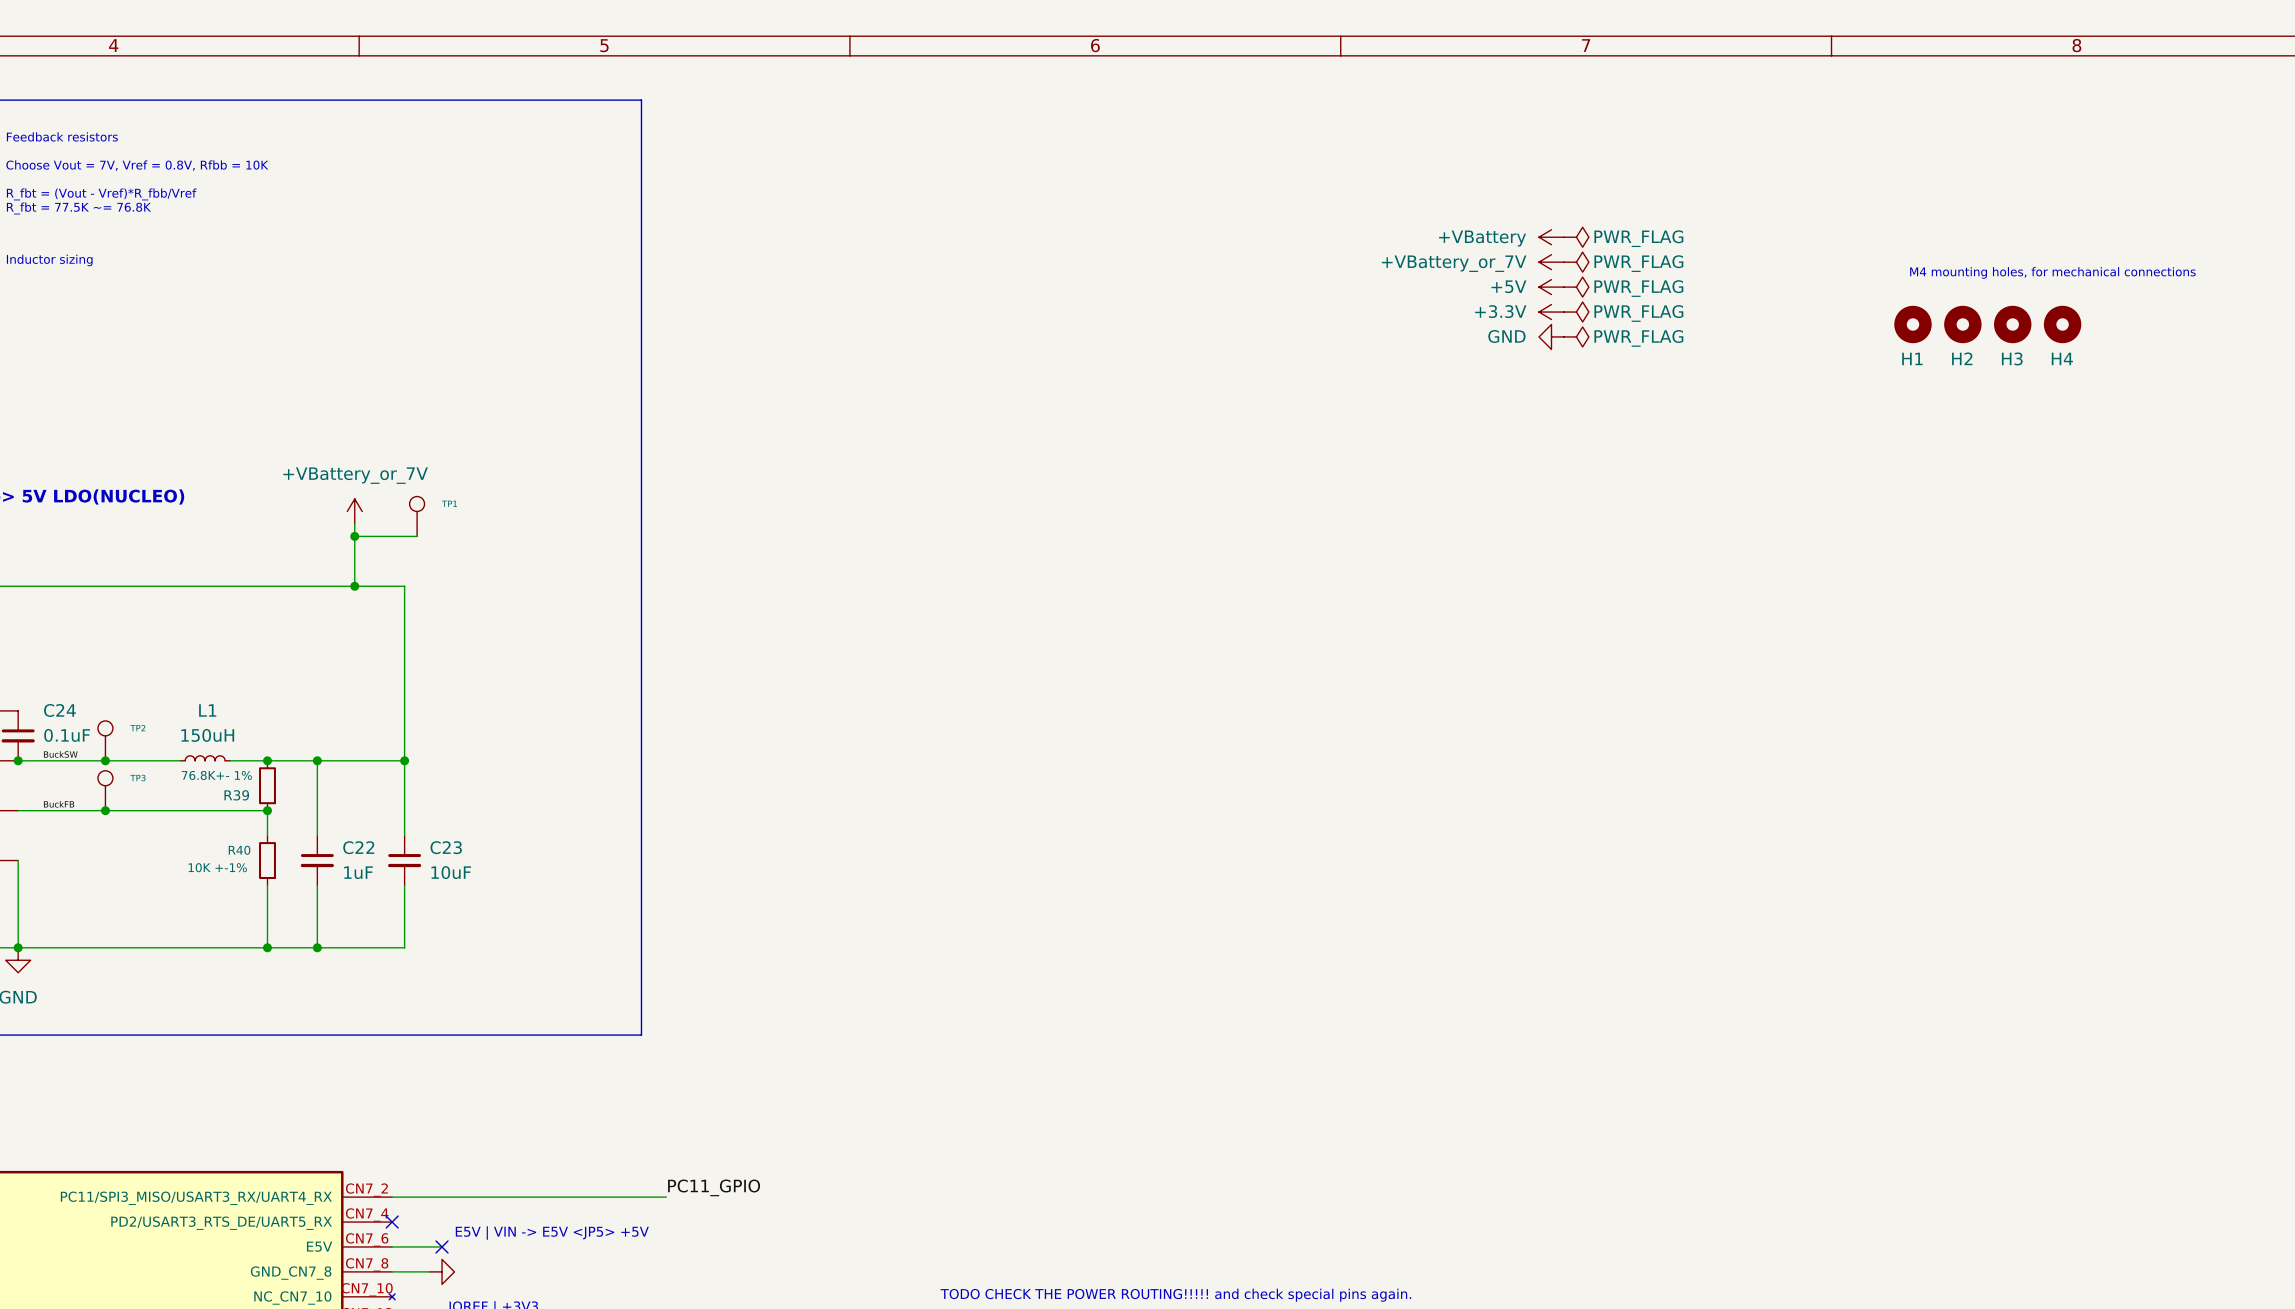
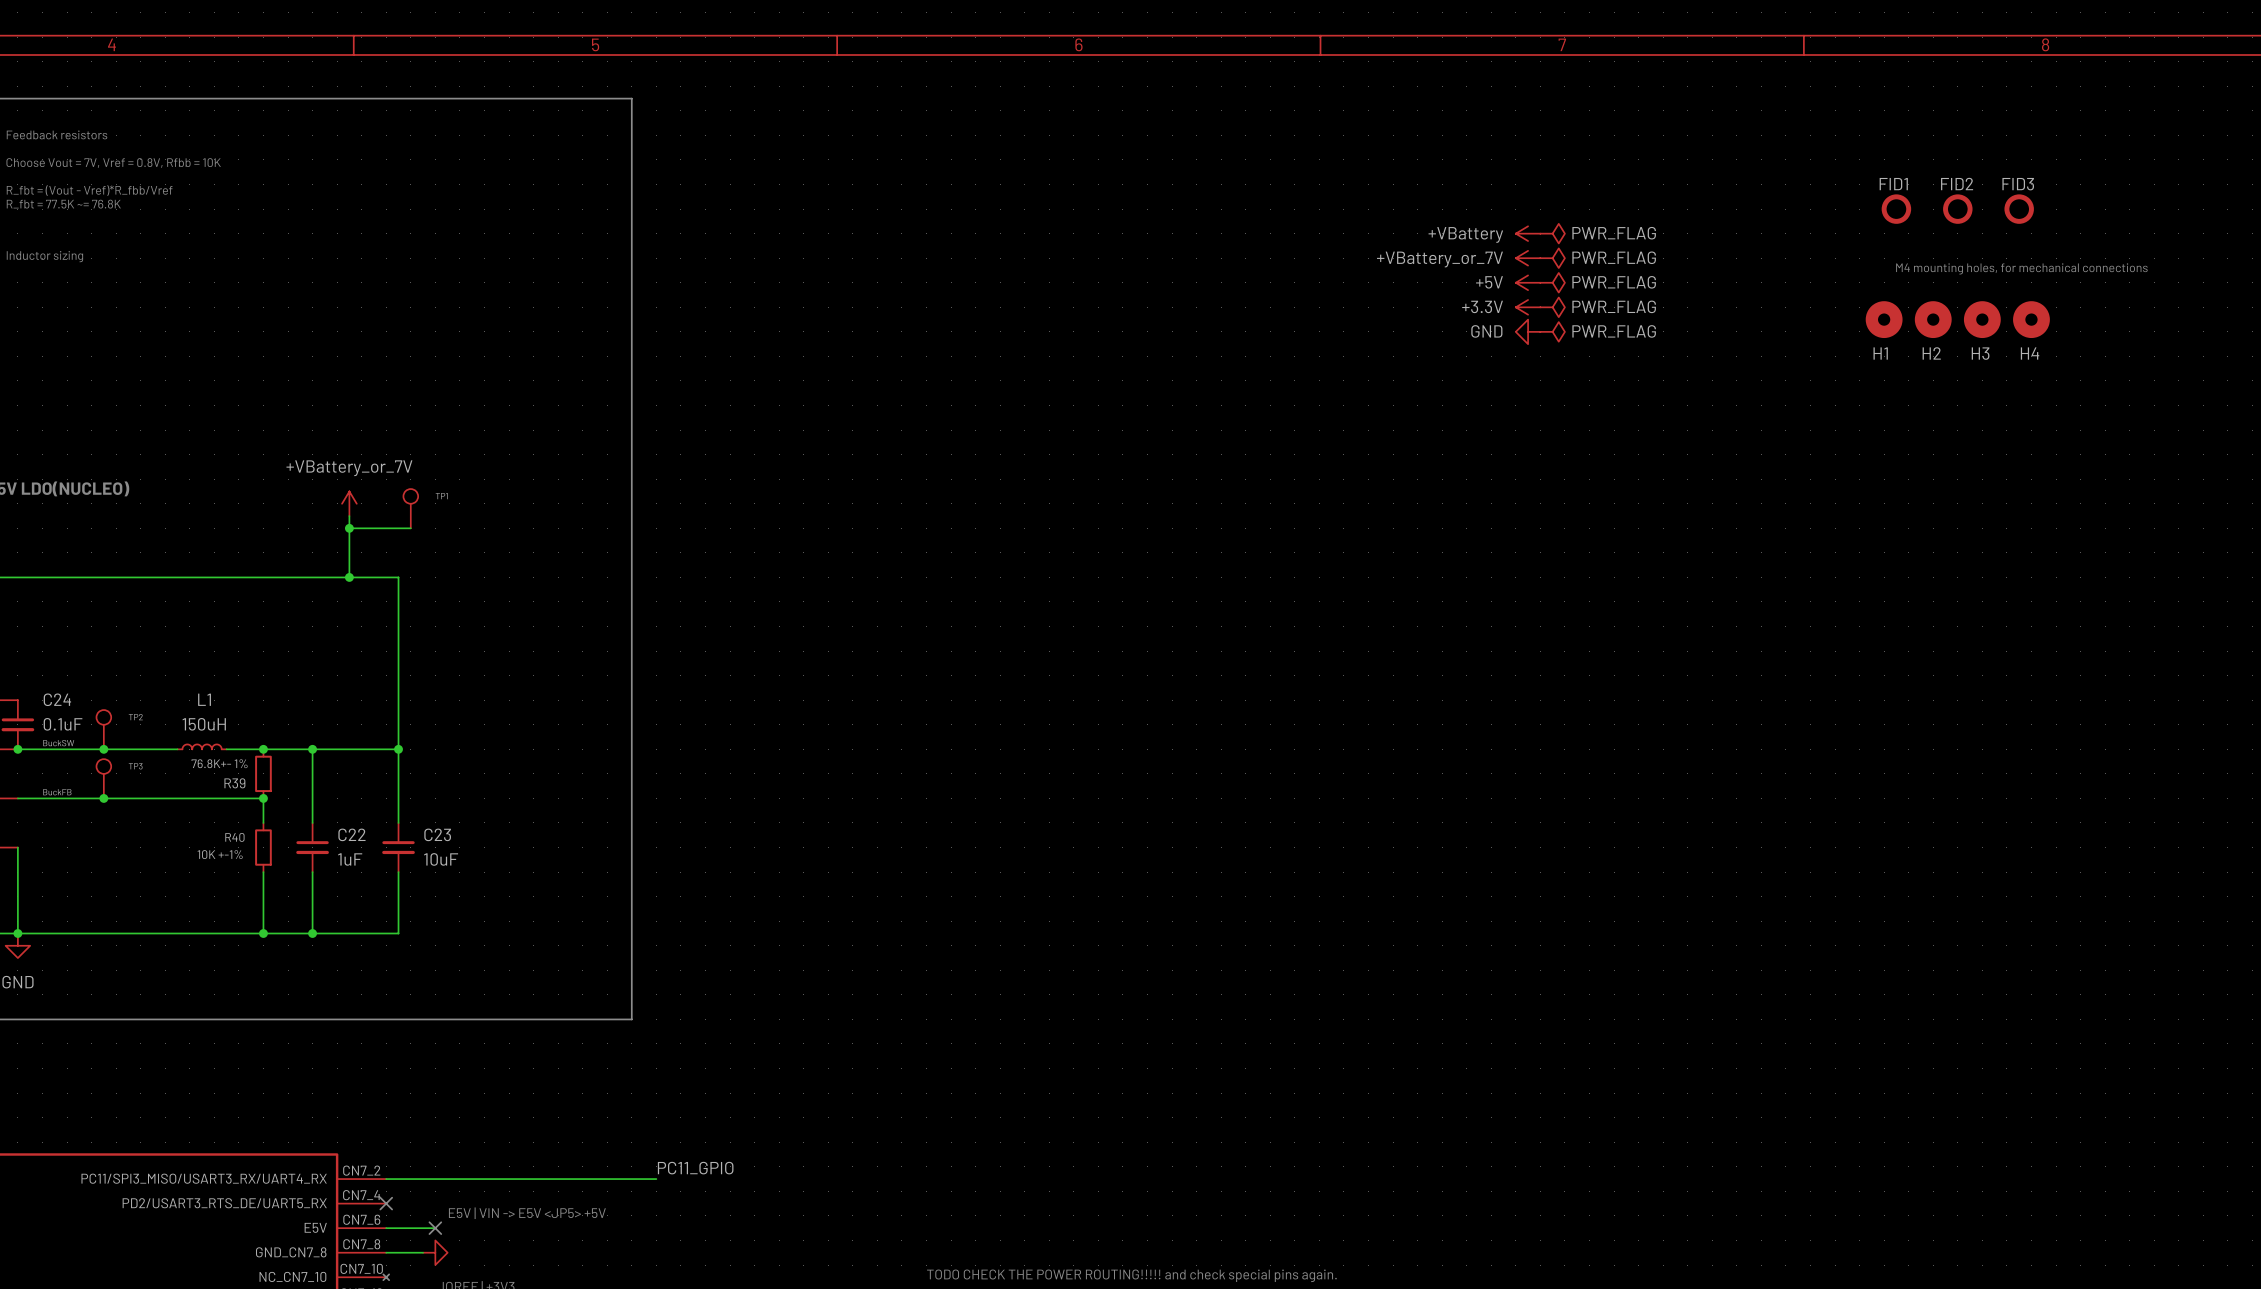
FID1: none -> (1896, 209)
FID2: none -> (1957, 209)
FID3: none -> (2019, 209)

